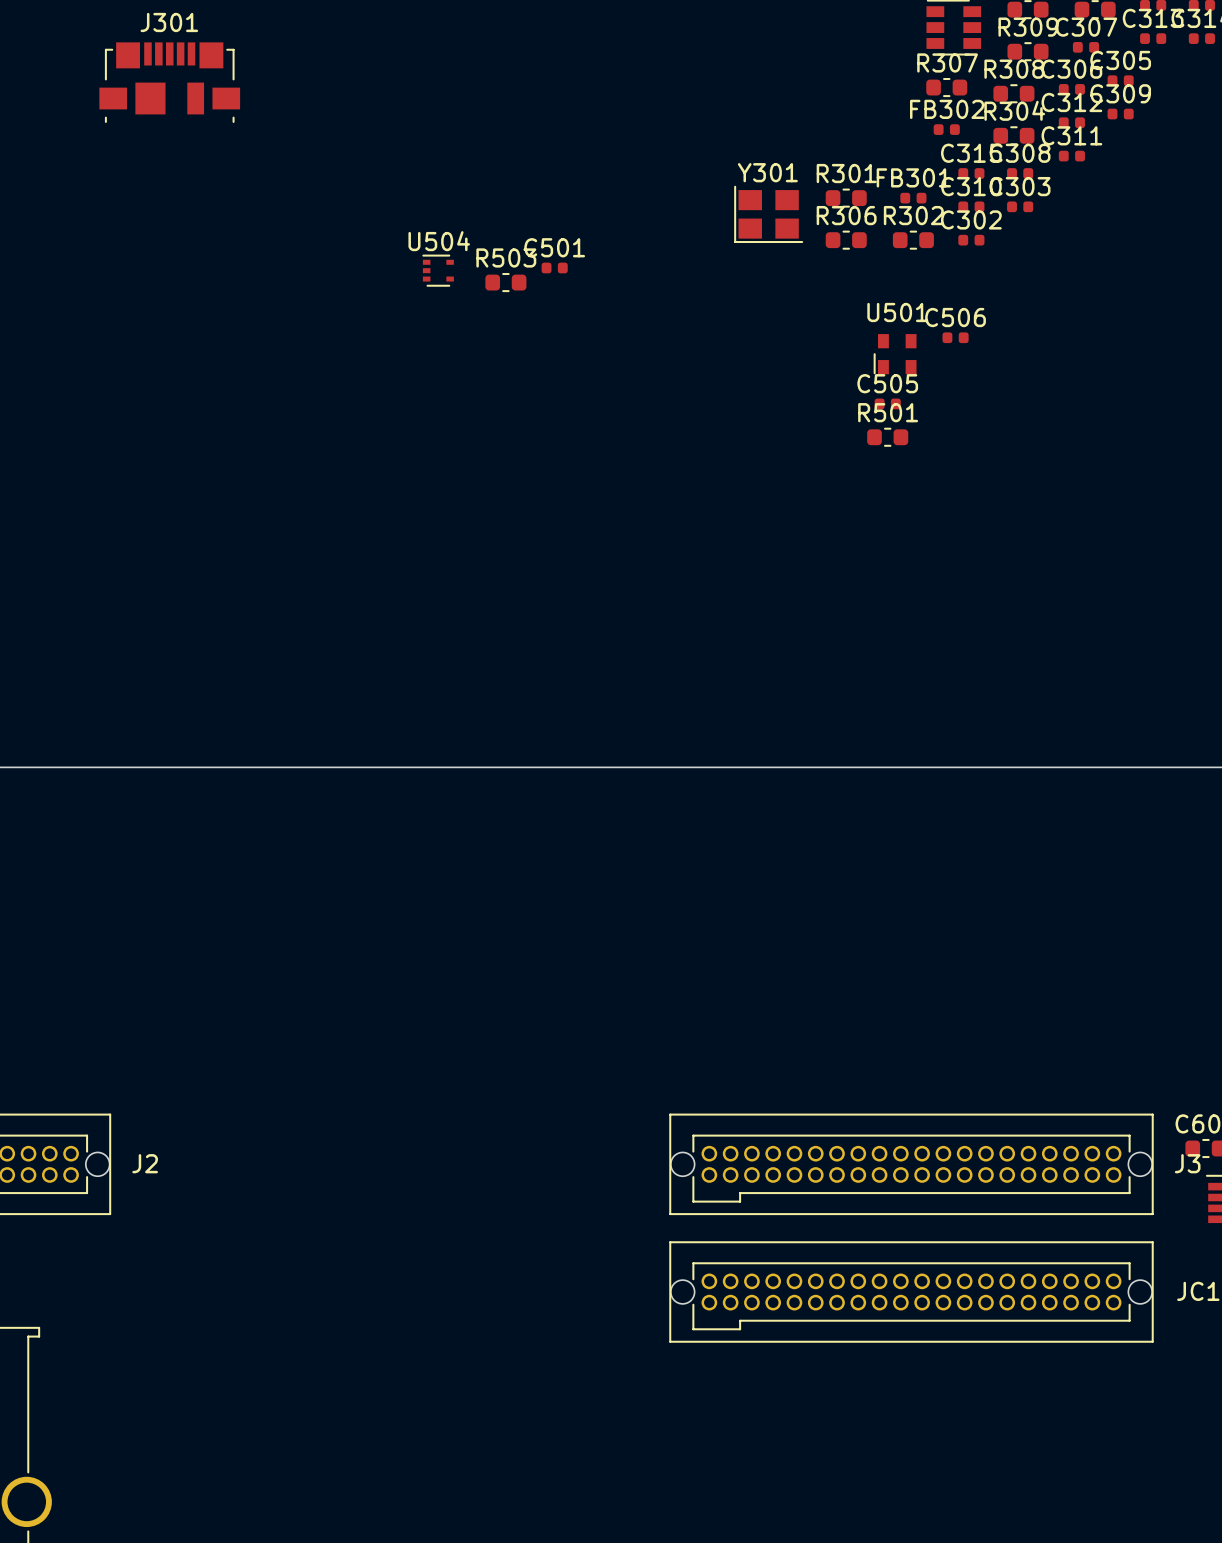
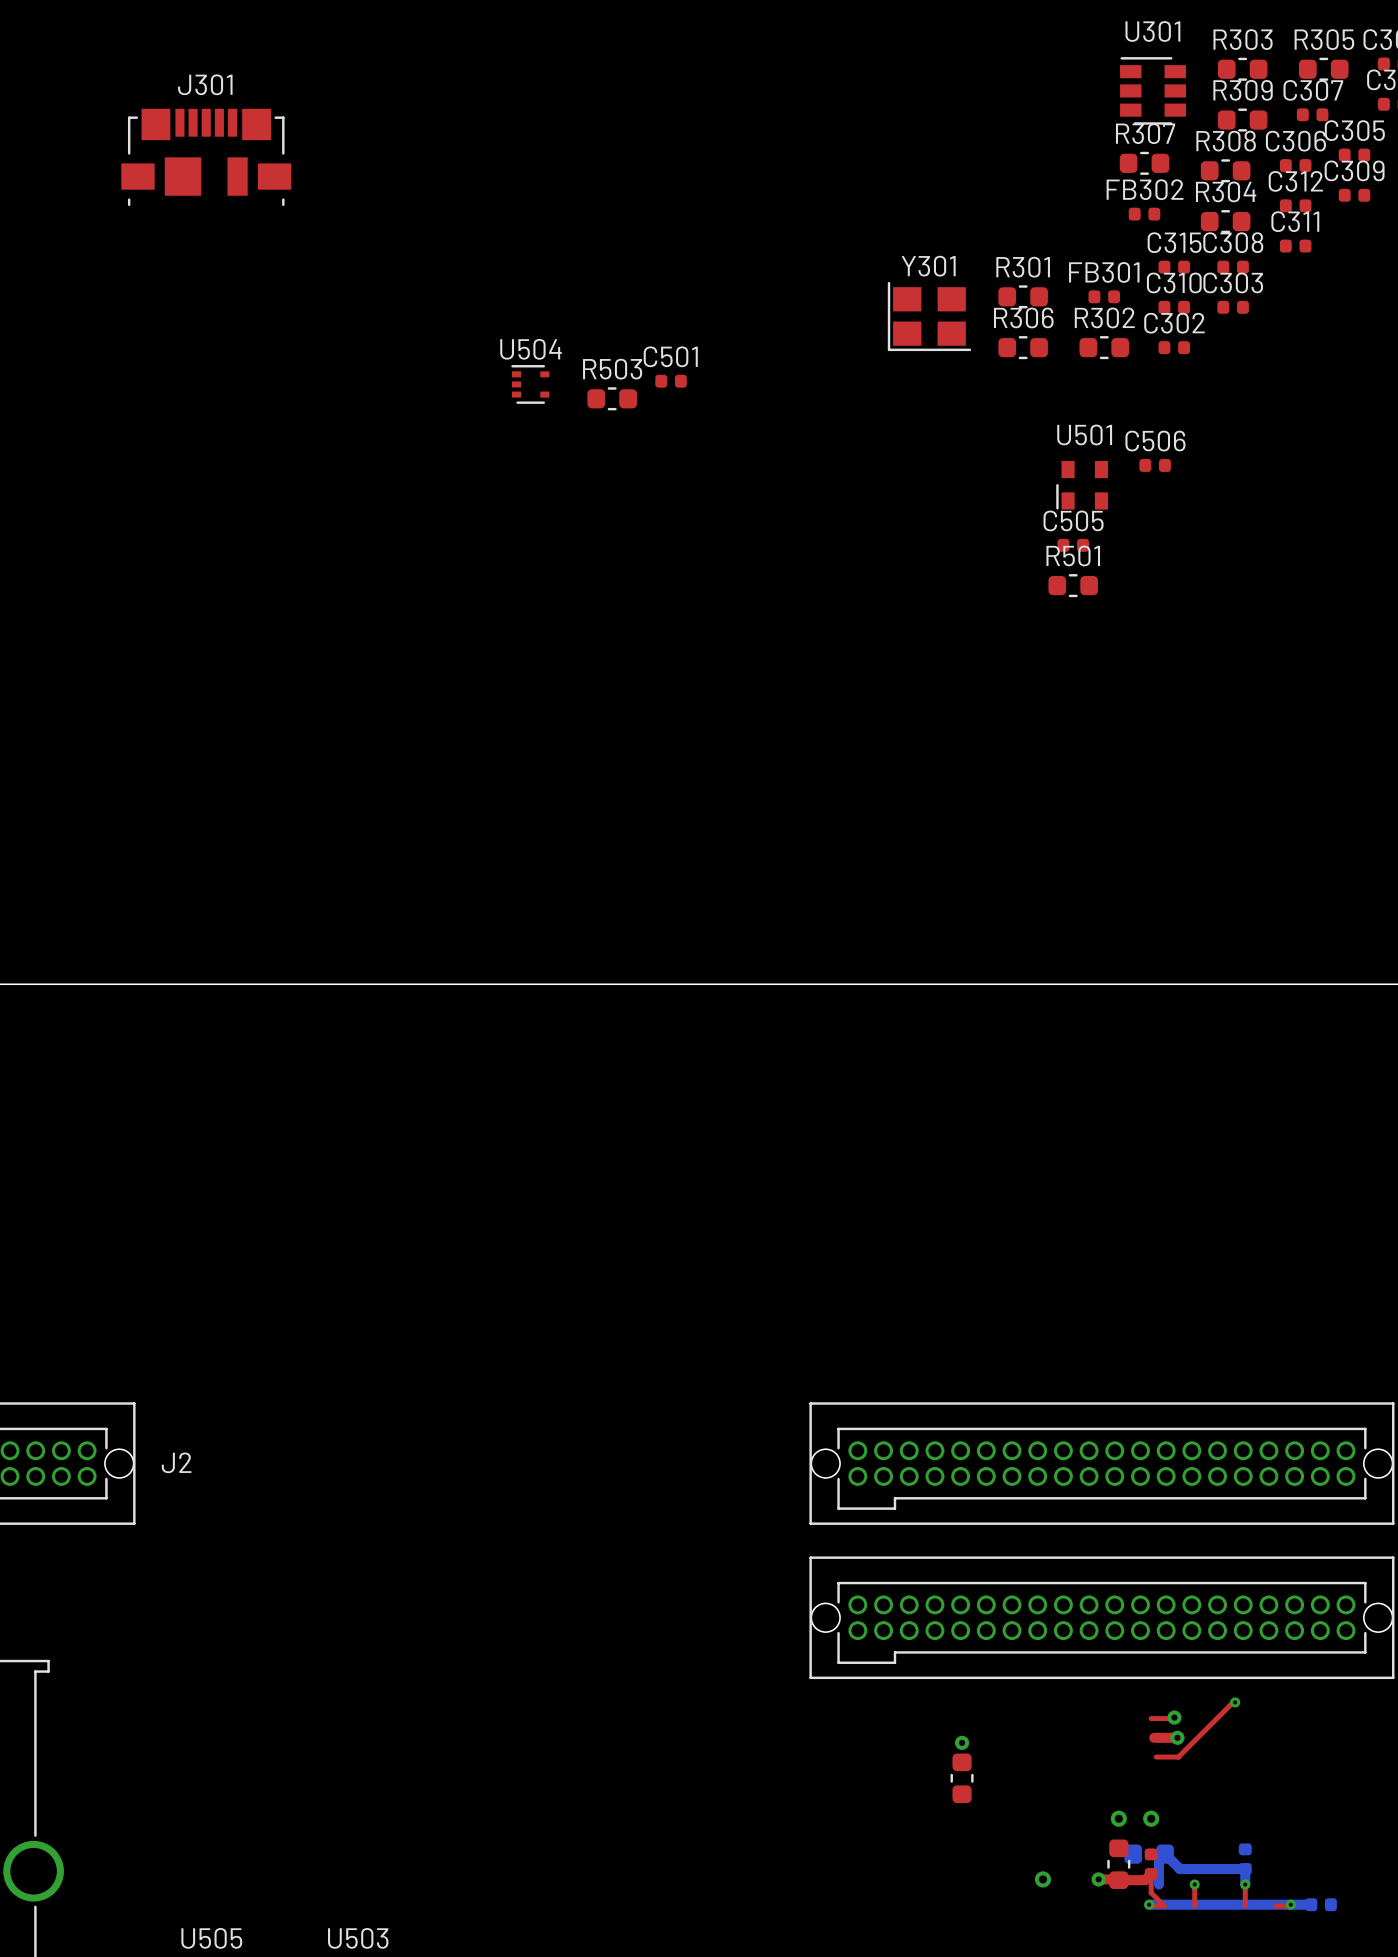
top track: none -> (1235, 1702) (1178, 1757) (1156, 1757)
via: none -> (1235, 1702)
via: none -> (1174, 1717)
top track: none -> (1151, 1718) (1173, 1718)
top track: none -> (1154, 1737) (1177, 1737)
via: none -> (1177, 1737)
via: none -> (962, 1742)
part: none -> (962, 1778)
via: none -> (1118, 1818)
via: none -> (1151, 1818)
part: none -> (1149, 1854)
part: none -> (1245, 1859)
part: none -> (1118, 1864)
part: none -> (1151, 1864)
via: none -> (1042, 1879)
top track: none -> (1098, 1879) (1145, 1880) (1151, 1874) (1151, 1892) (1164, 1905) (1149, 1904)
via: none -> (1098, 1879)
bottom track: none -> (1158, 1884) (1158, 1860) (1165, 1854) (1179, 1869) (1245, 1869) (1245, 1884)
top track: none -> (1194, 1884) (1194, 1905)
via: none -> (1194, 1884)
top track: none -> (1245, 1884) (1245, 1905)
via: none -> (1245, 1884)
bottom track: none -> (1149, 1904) (1311, 1904)
via: none -> (1149, 1904)
top track: none -> (1290, 1904) (1275, 1905)
via: none -> (1290, 1904)
part: none -> (1321, 1904)

